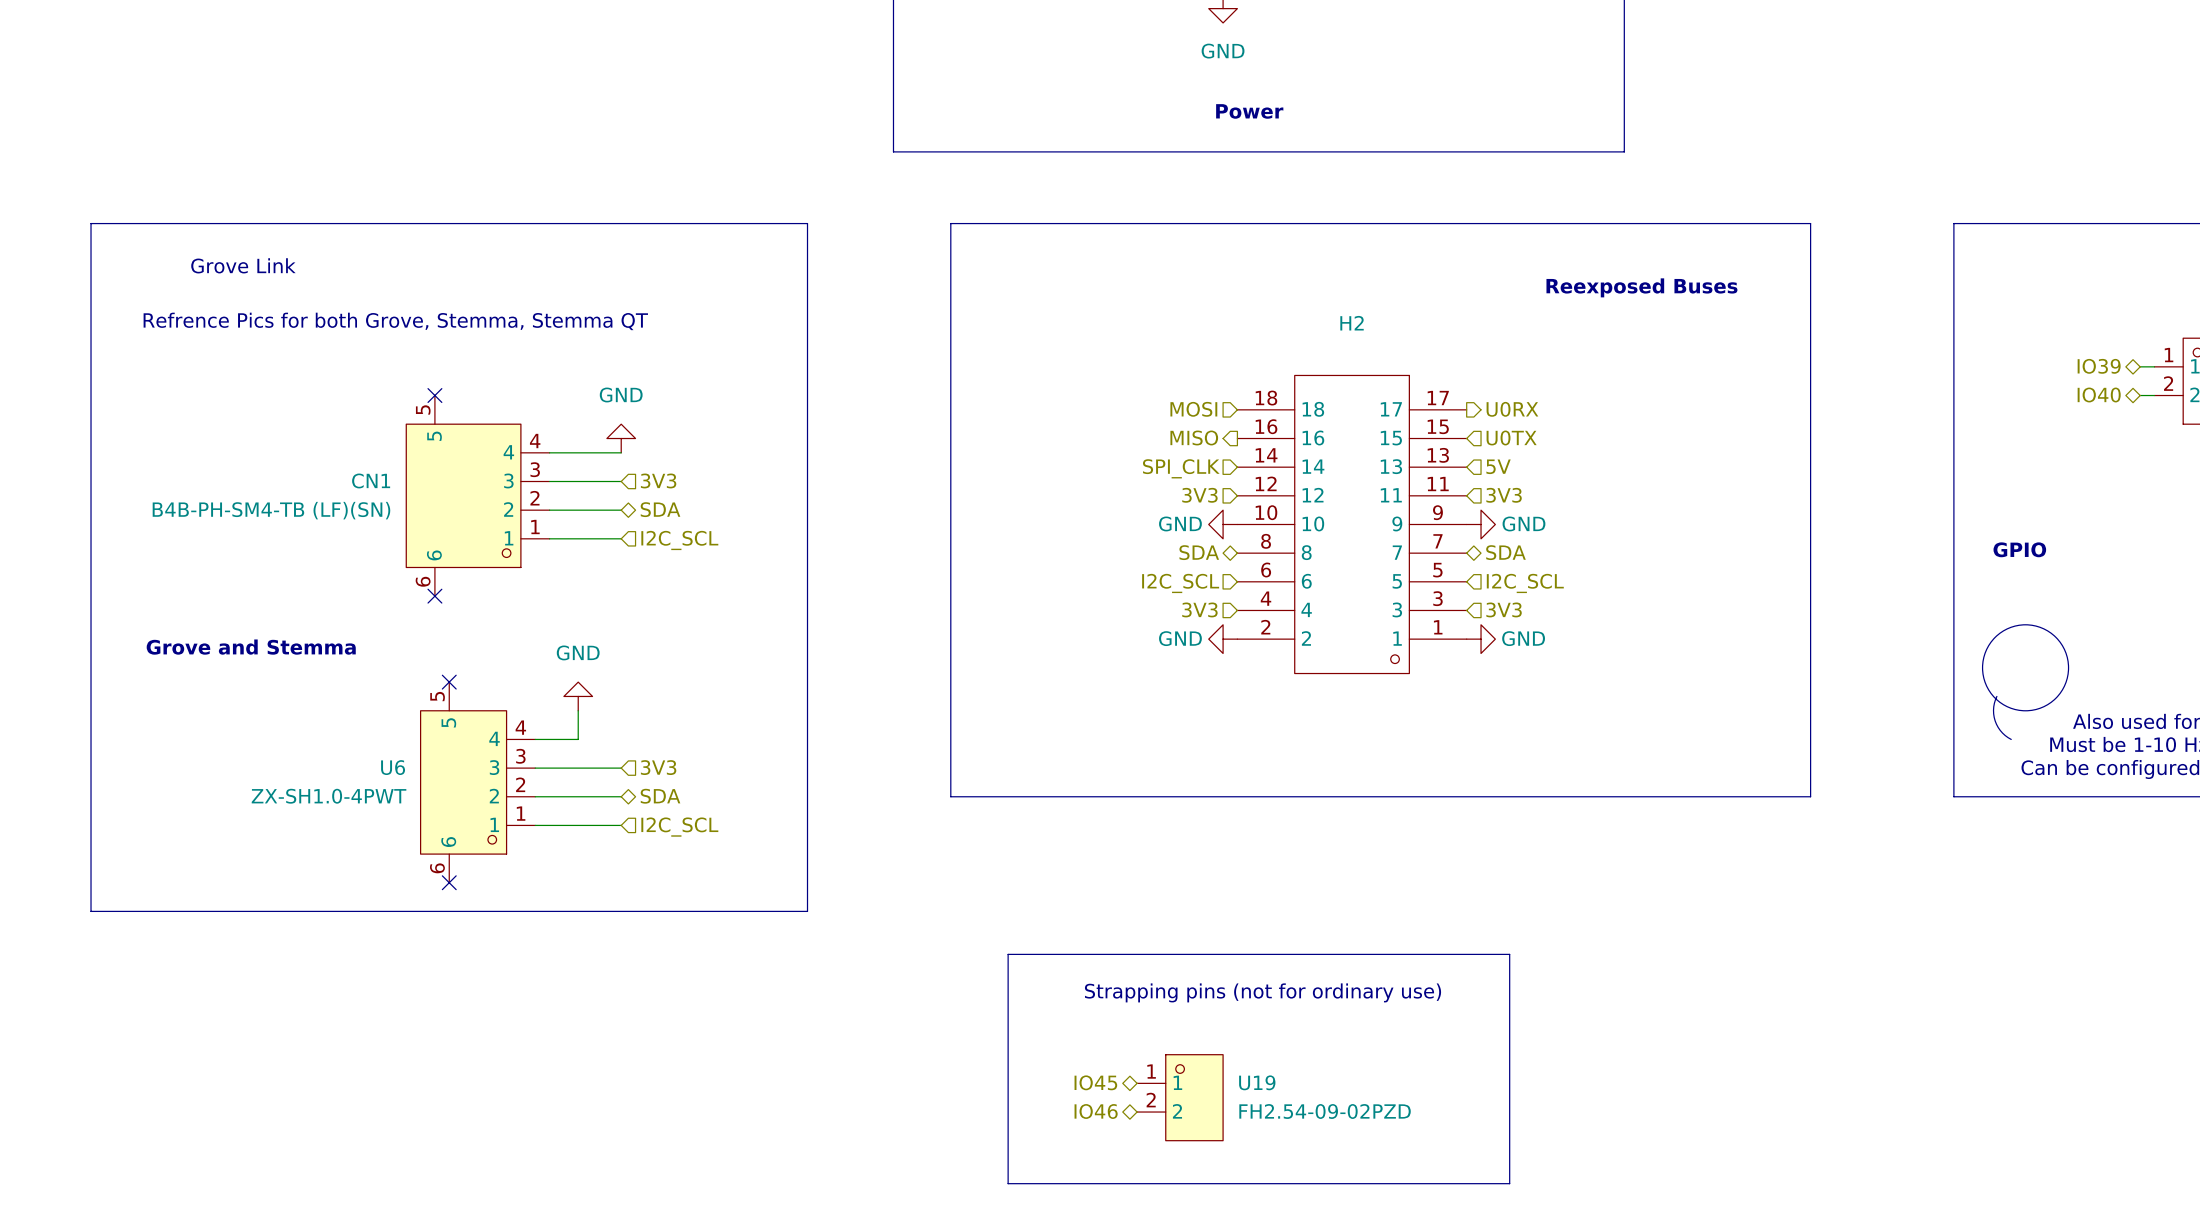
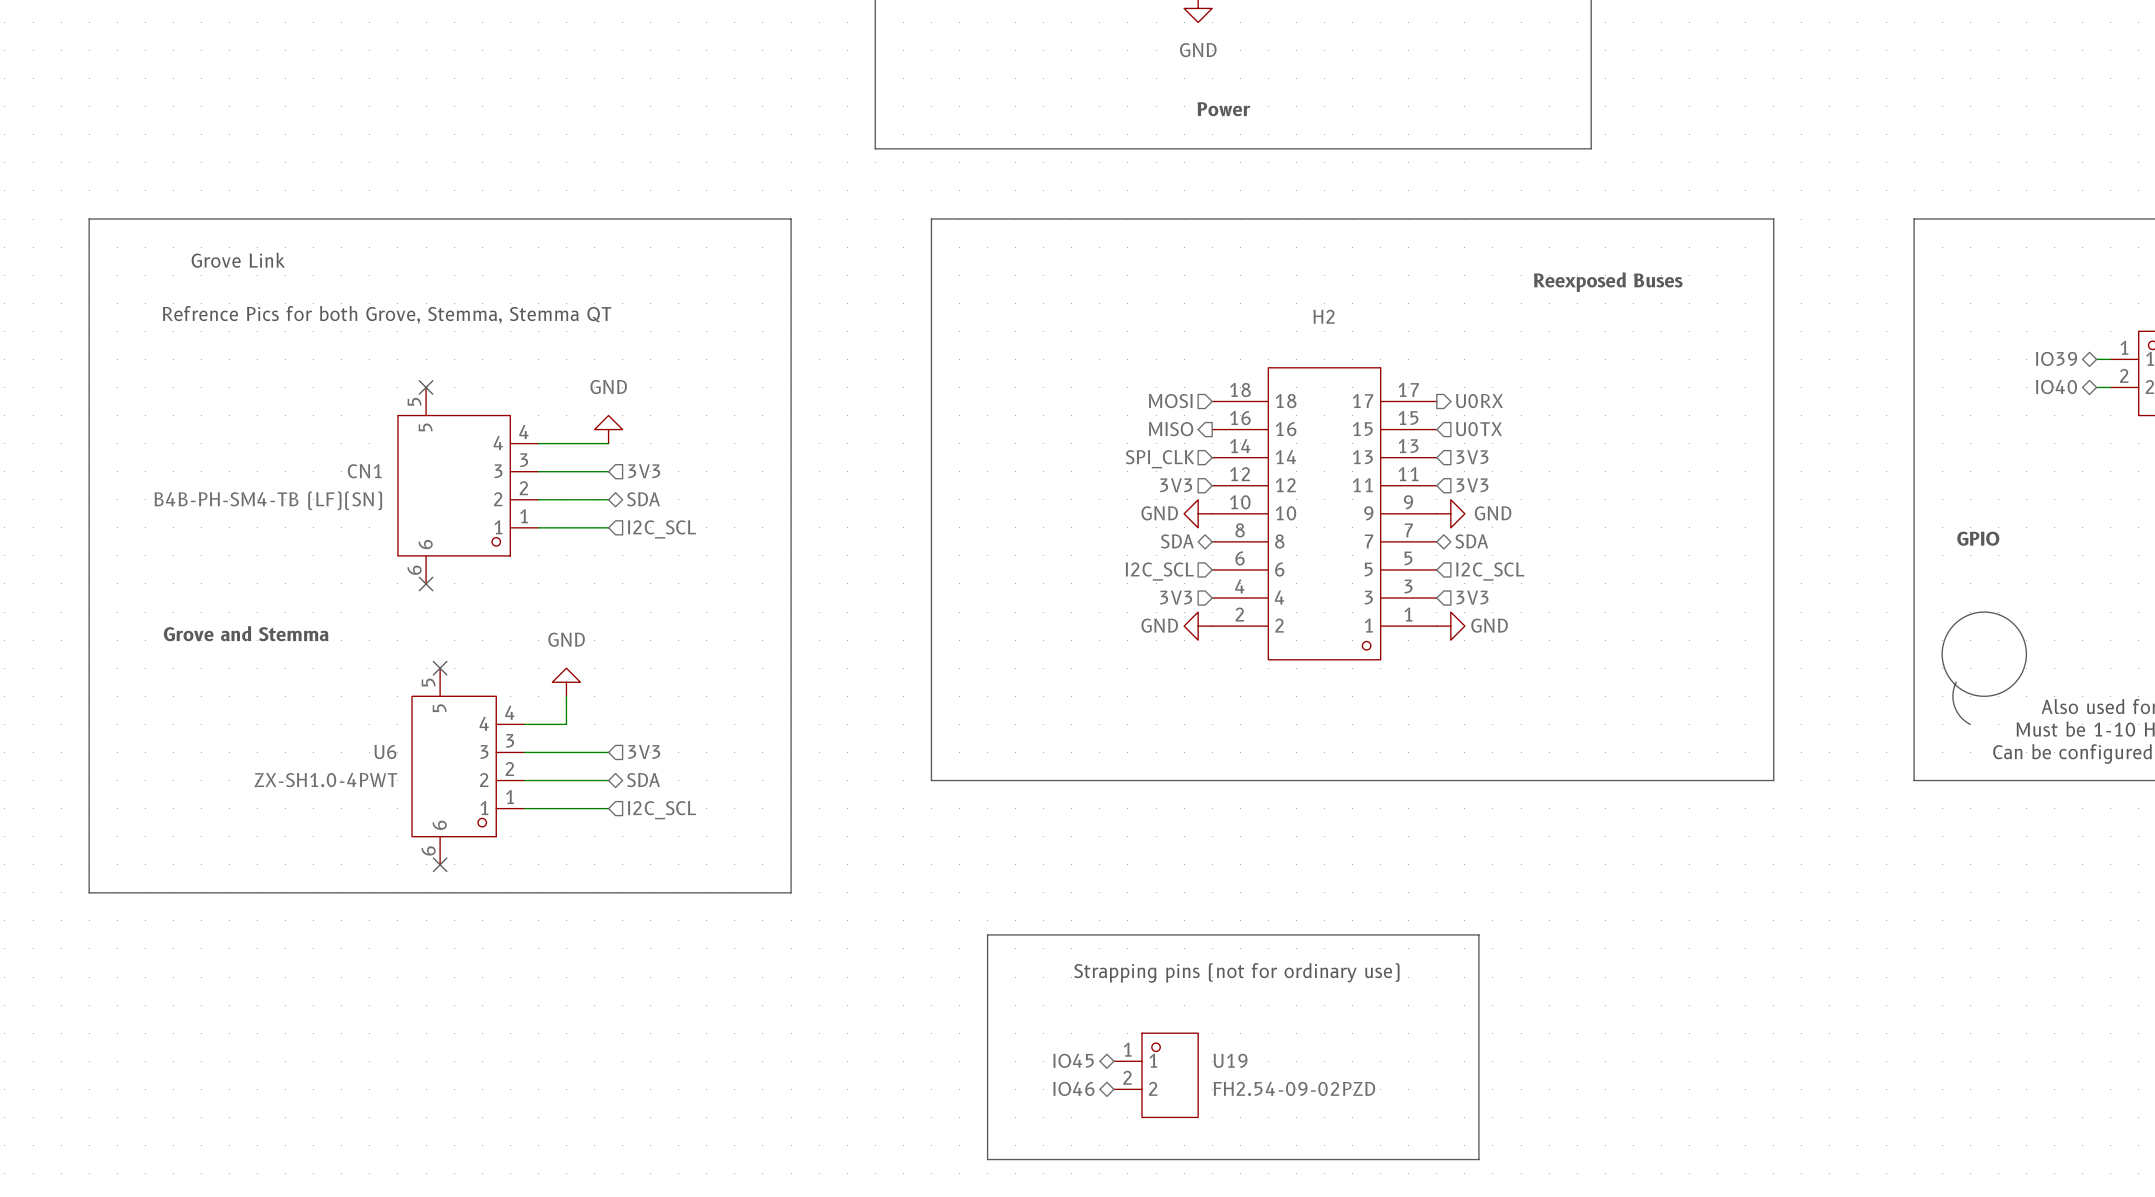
hierarchical label: 5V (1498, 466) -> 3V3 (1472, 457)

